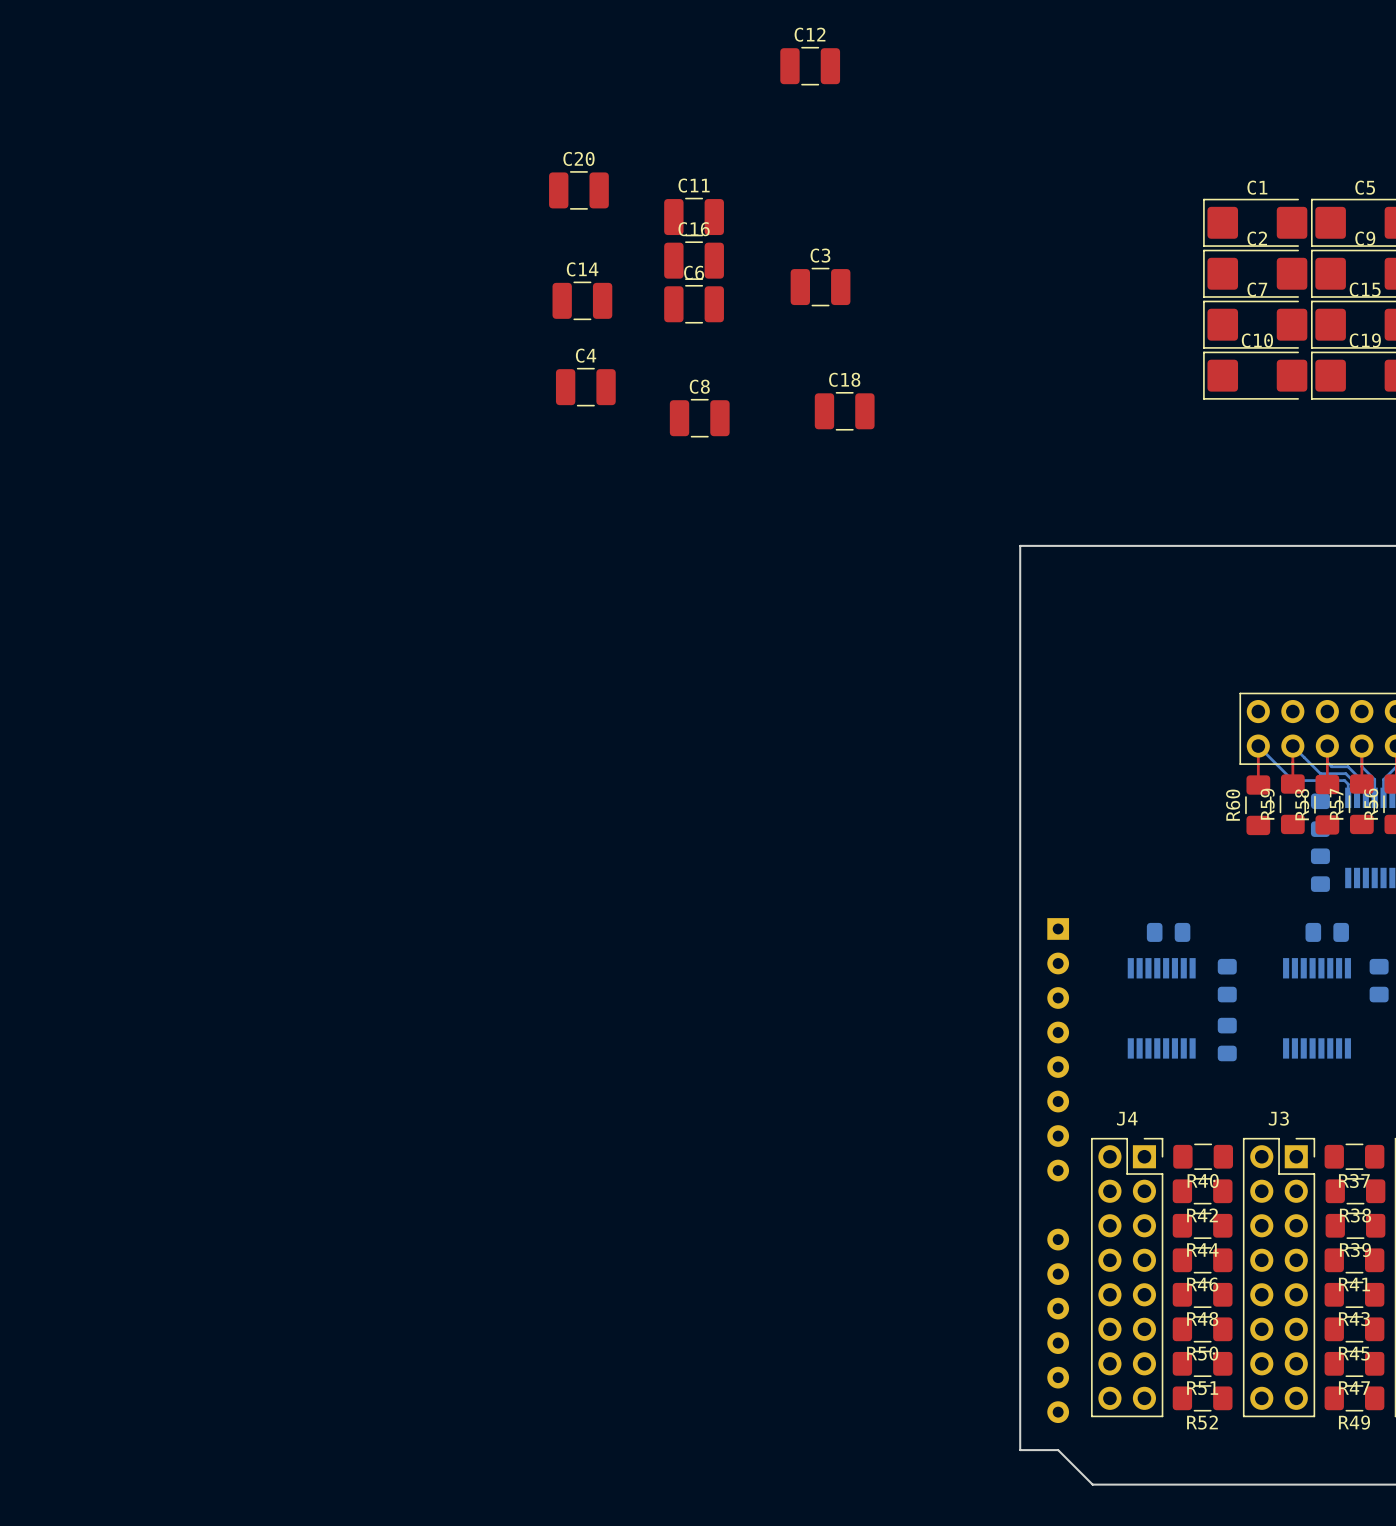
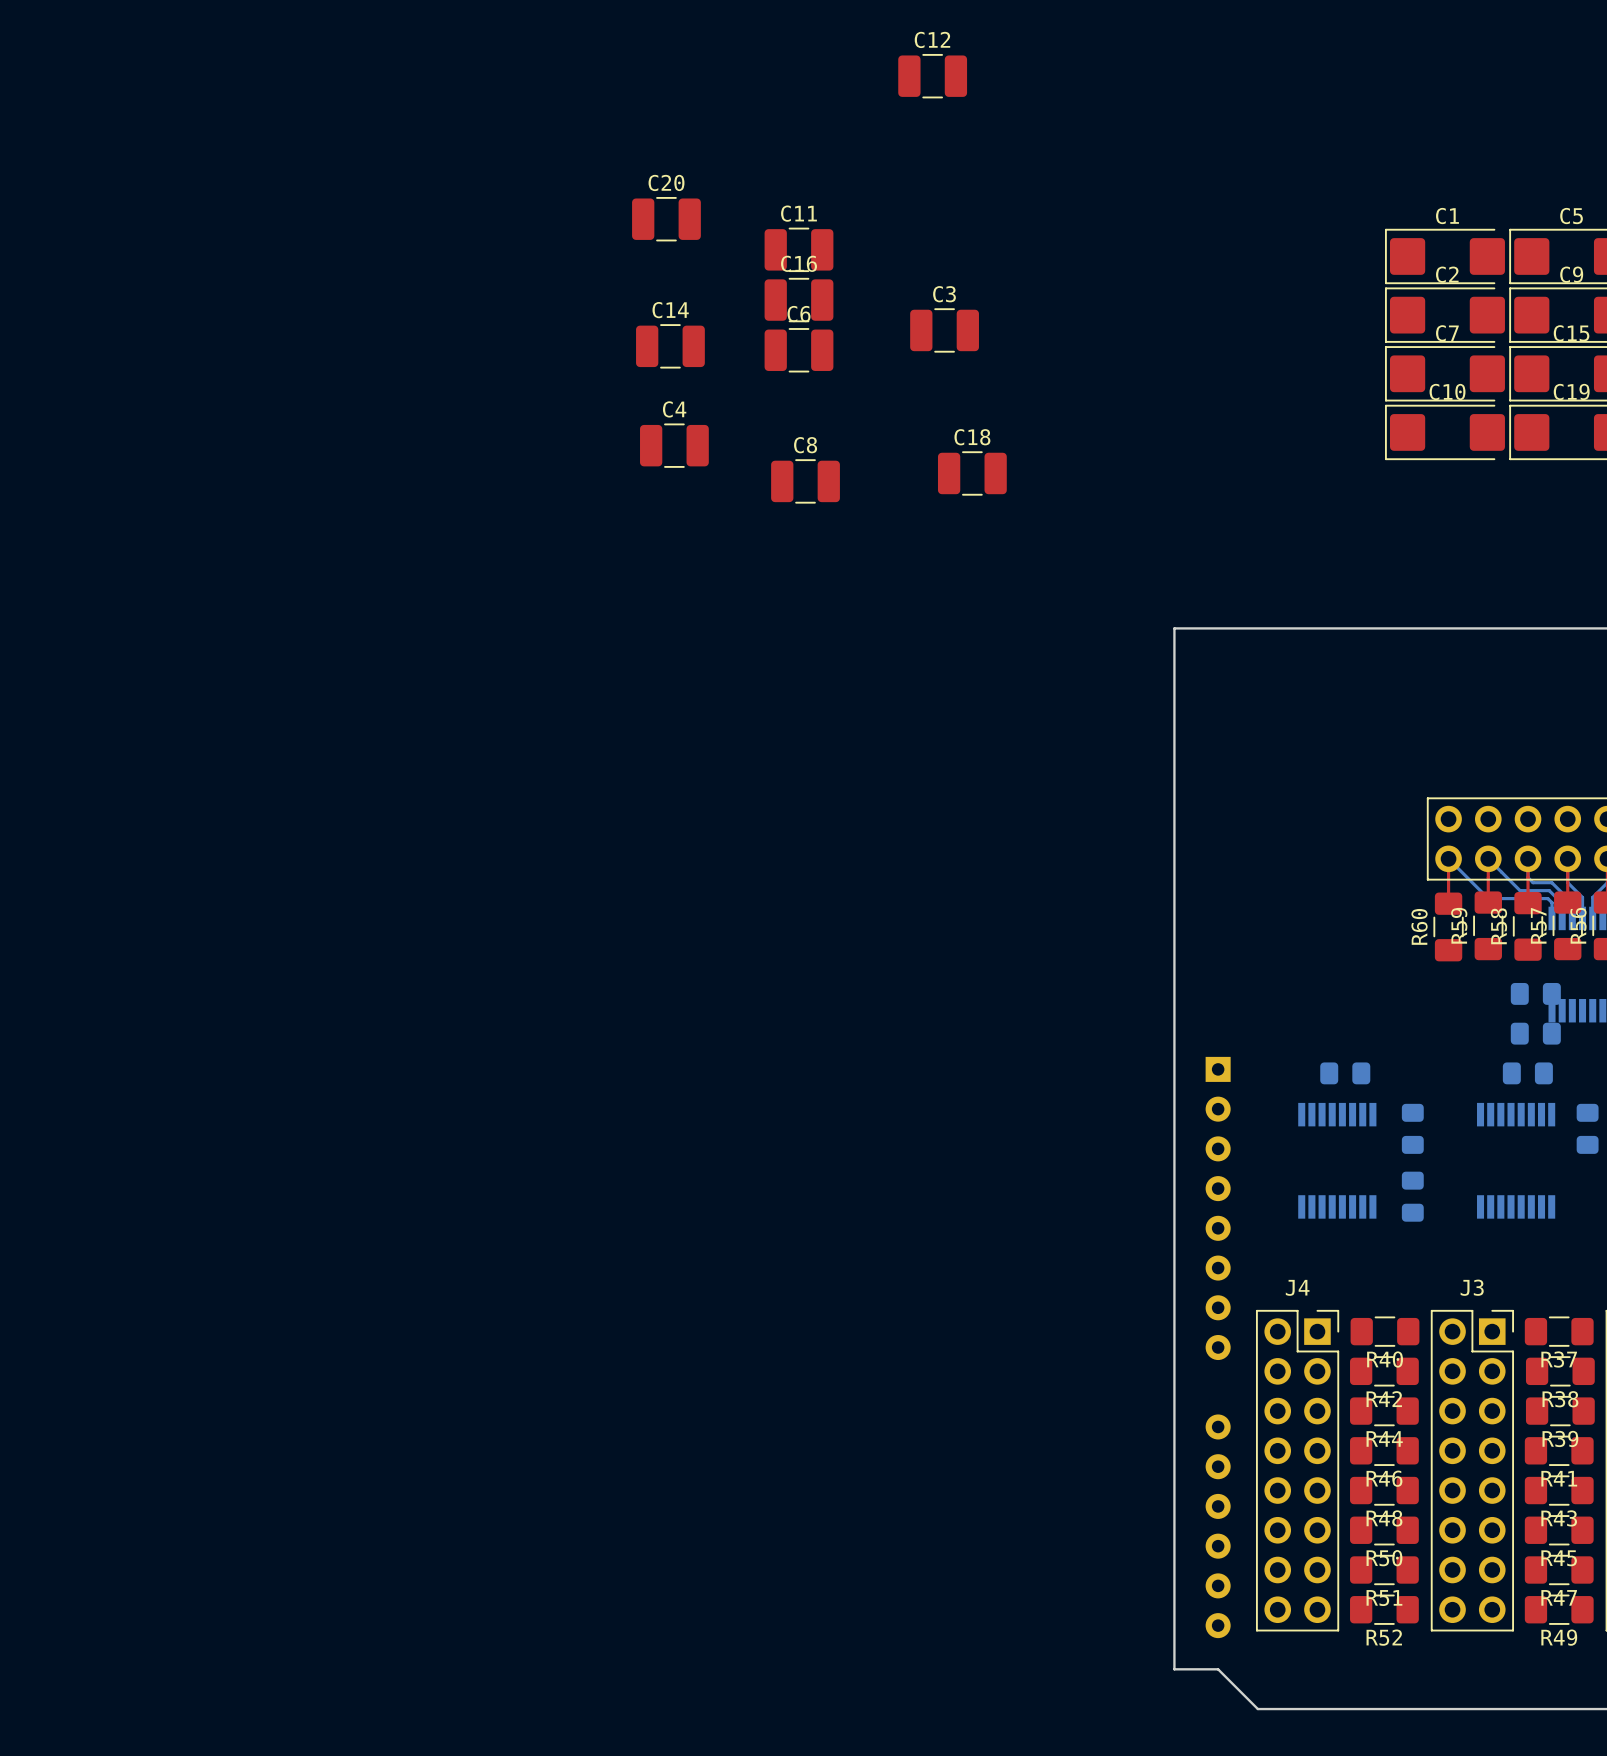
part: (1320, 815) -> none
part rotation: 0° (1320, 870) -> 90° clockwise (1535, 993)
part: none -> (1535, 1033)

